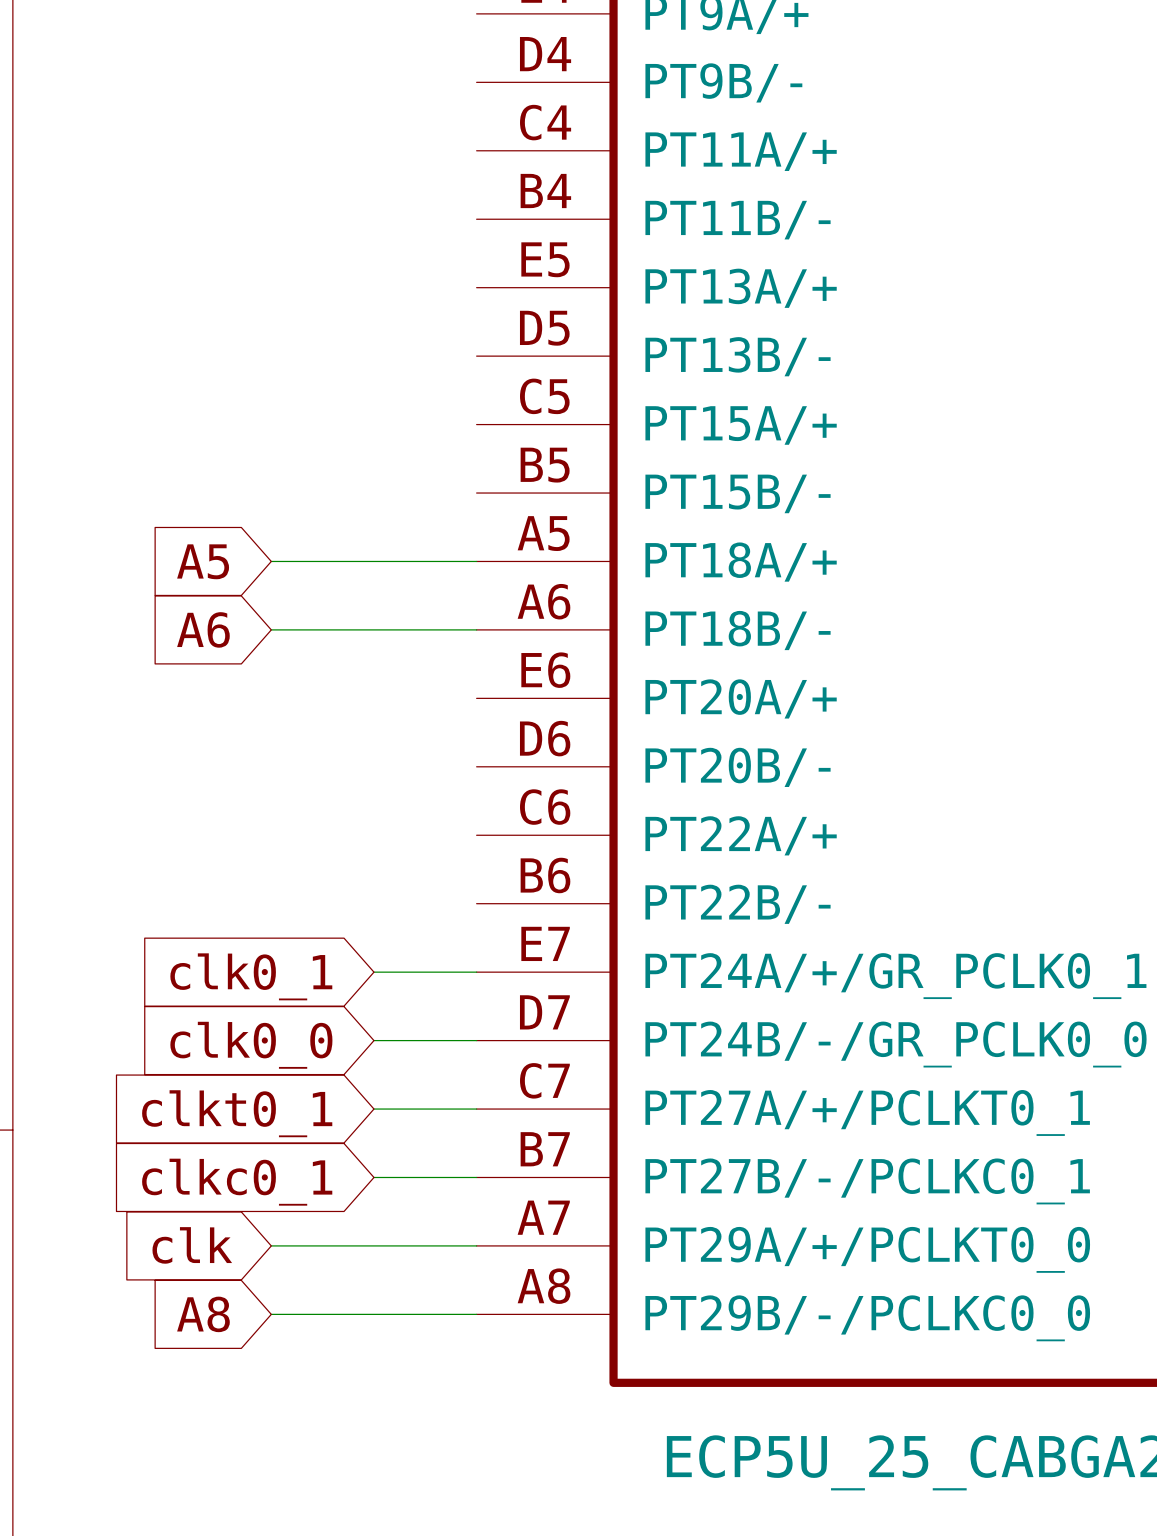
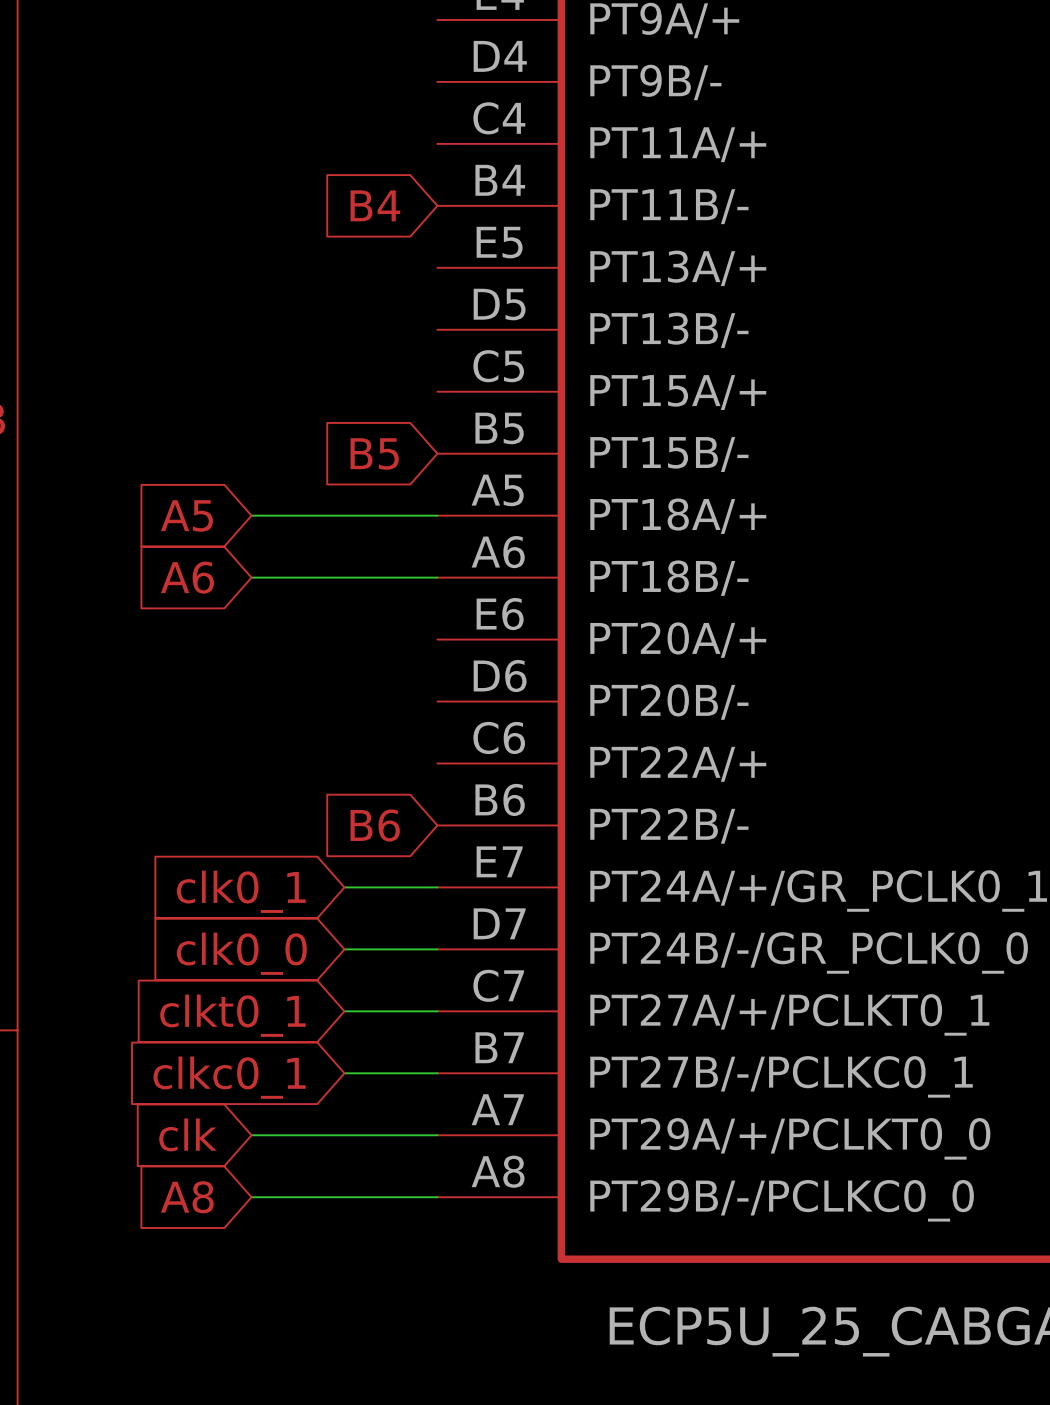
global label: none -> B4 (375, 205)
global label: none -> B5 (374, 454)
global label: none -> B6 (375, 825)

